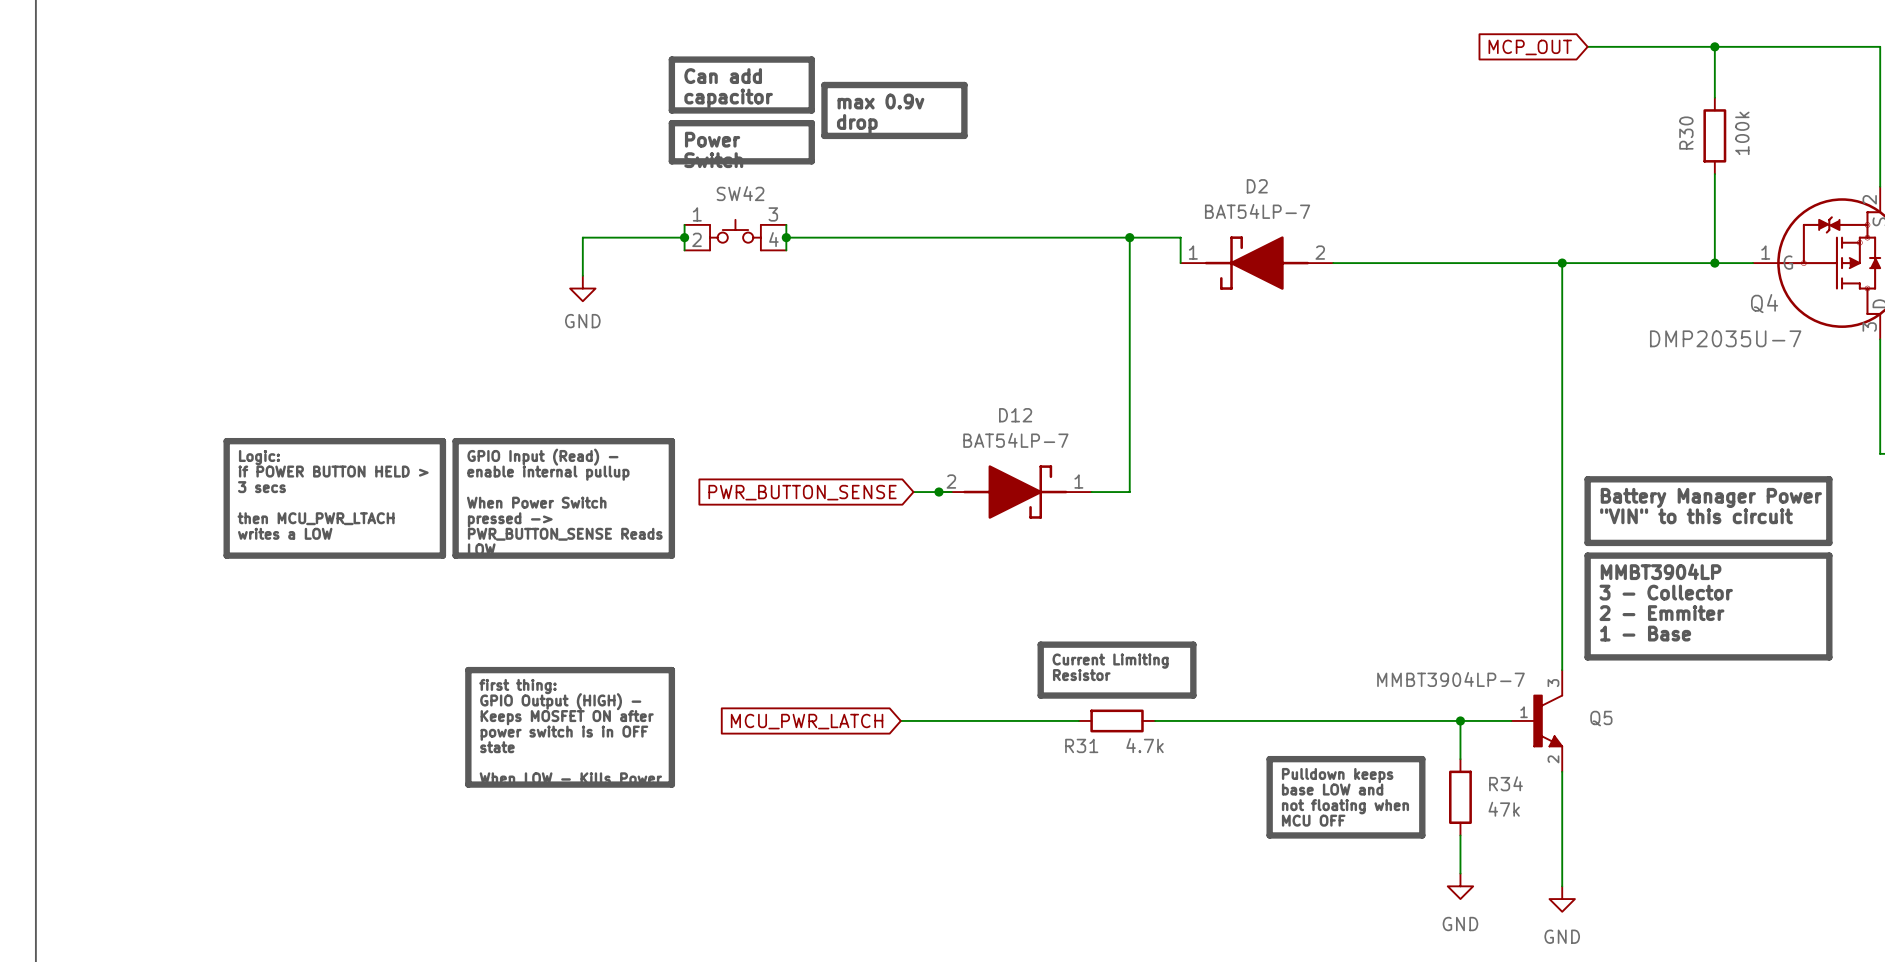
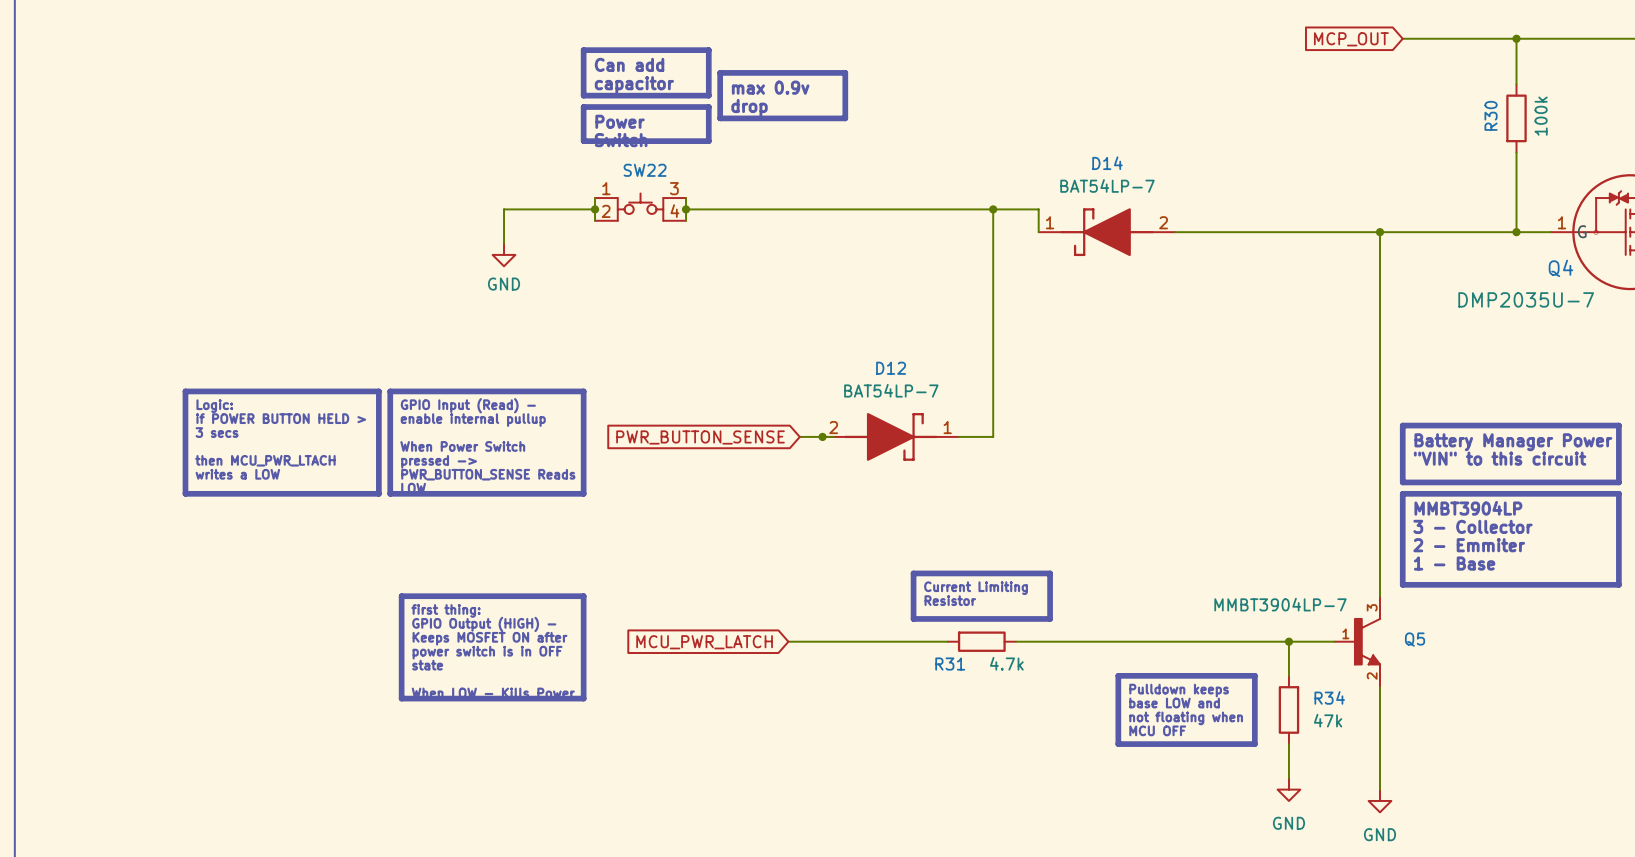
D2 name: D2 (1257, 186) -> D14 (1107, 163)
SW42 name: SW42 (740, 193) -> SW22 (645, 170)

